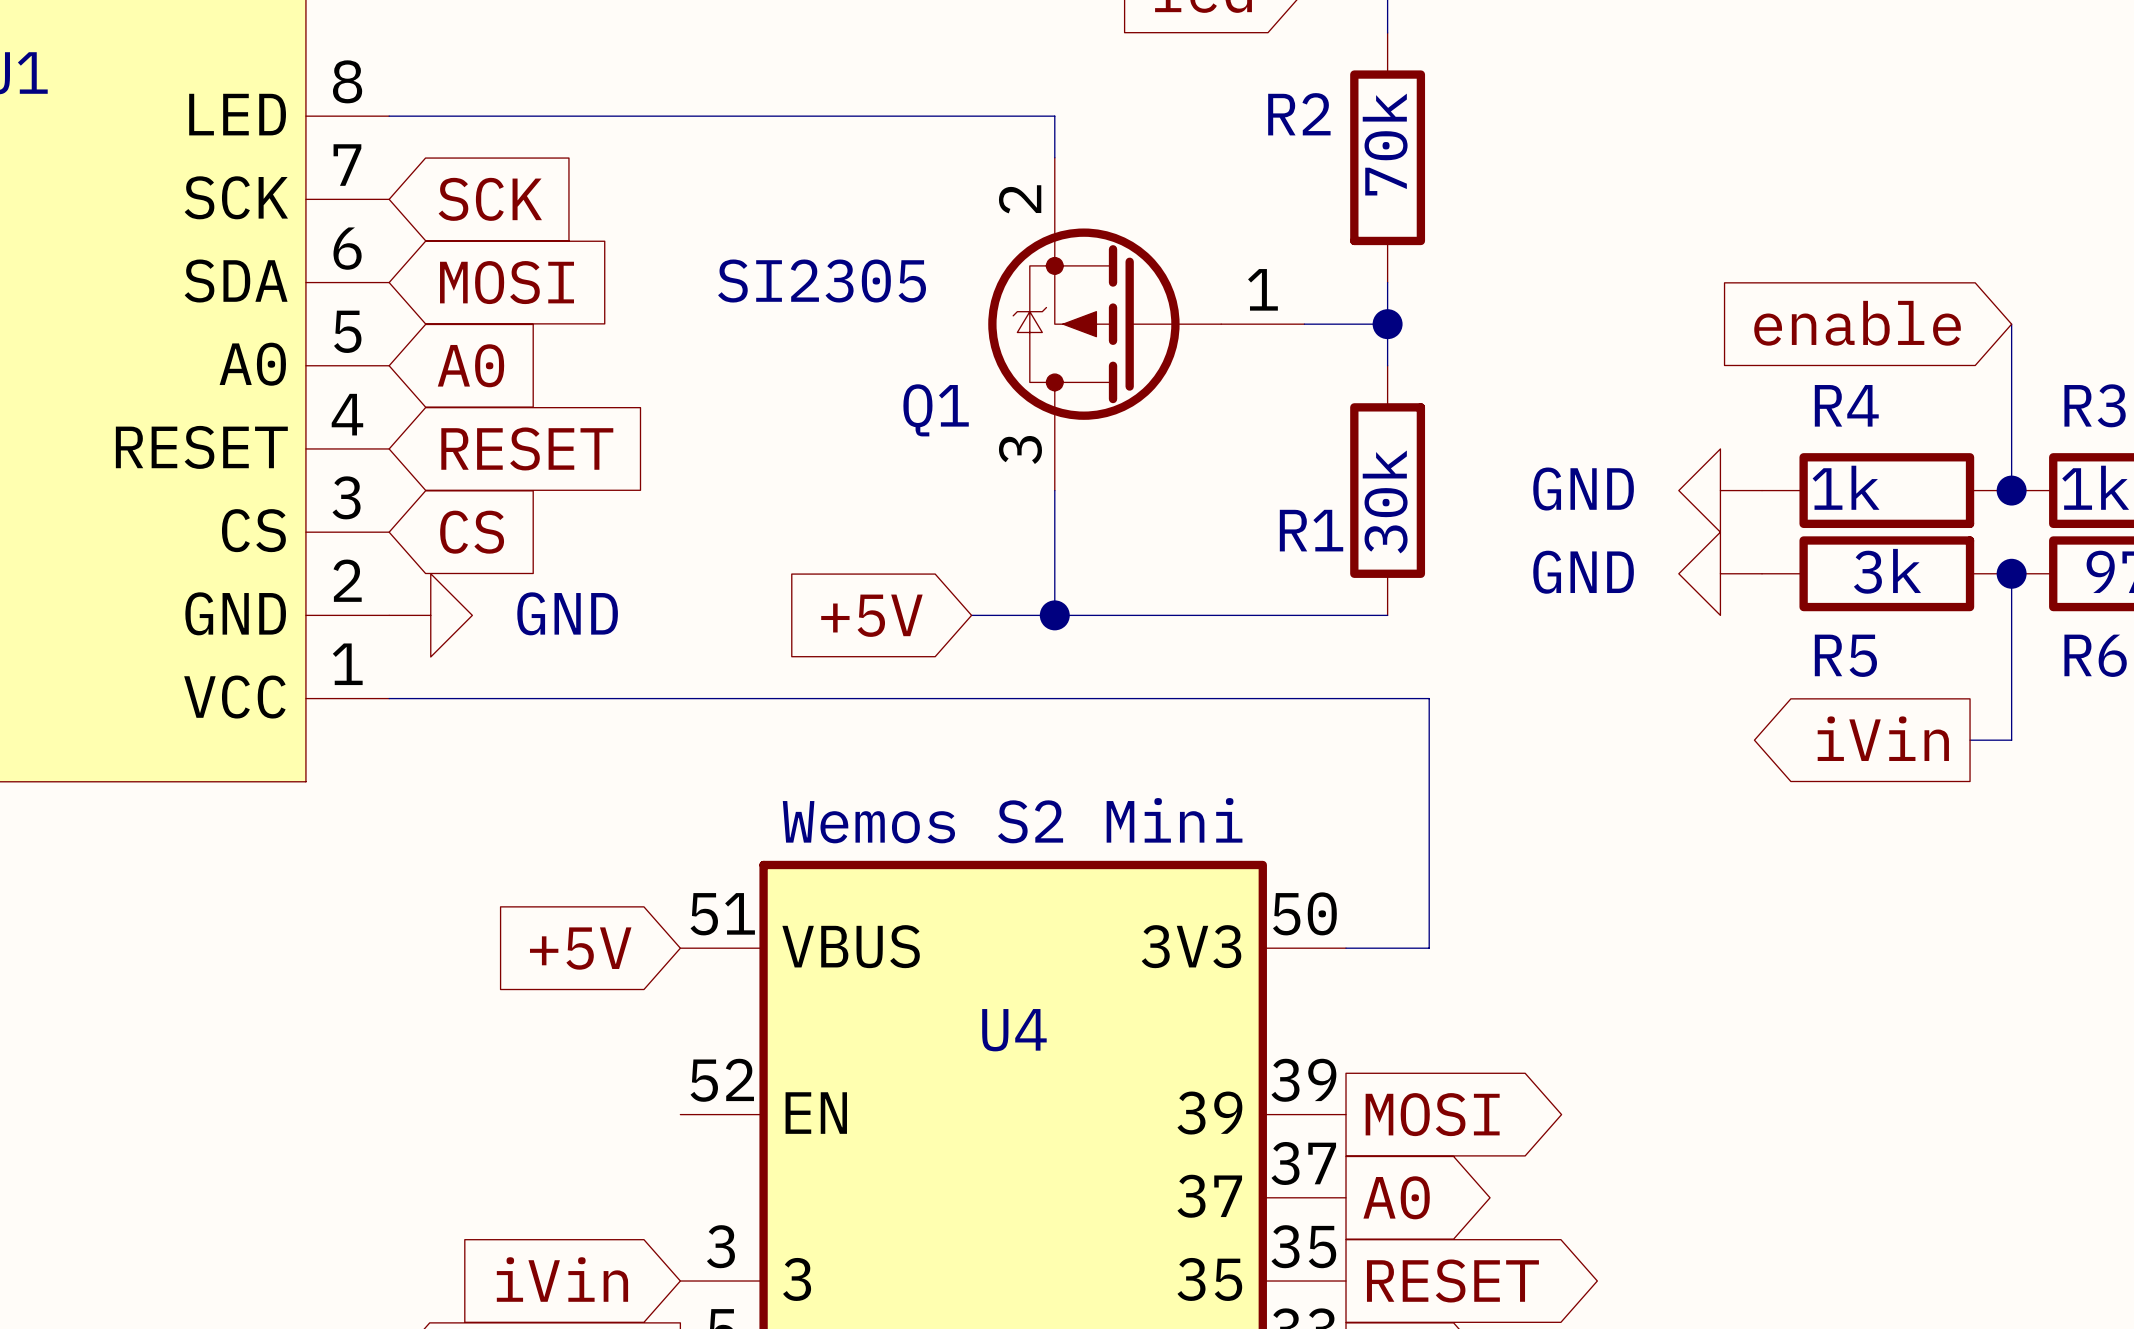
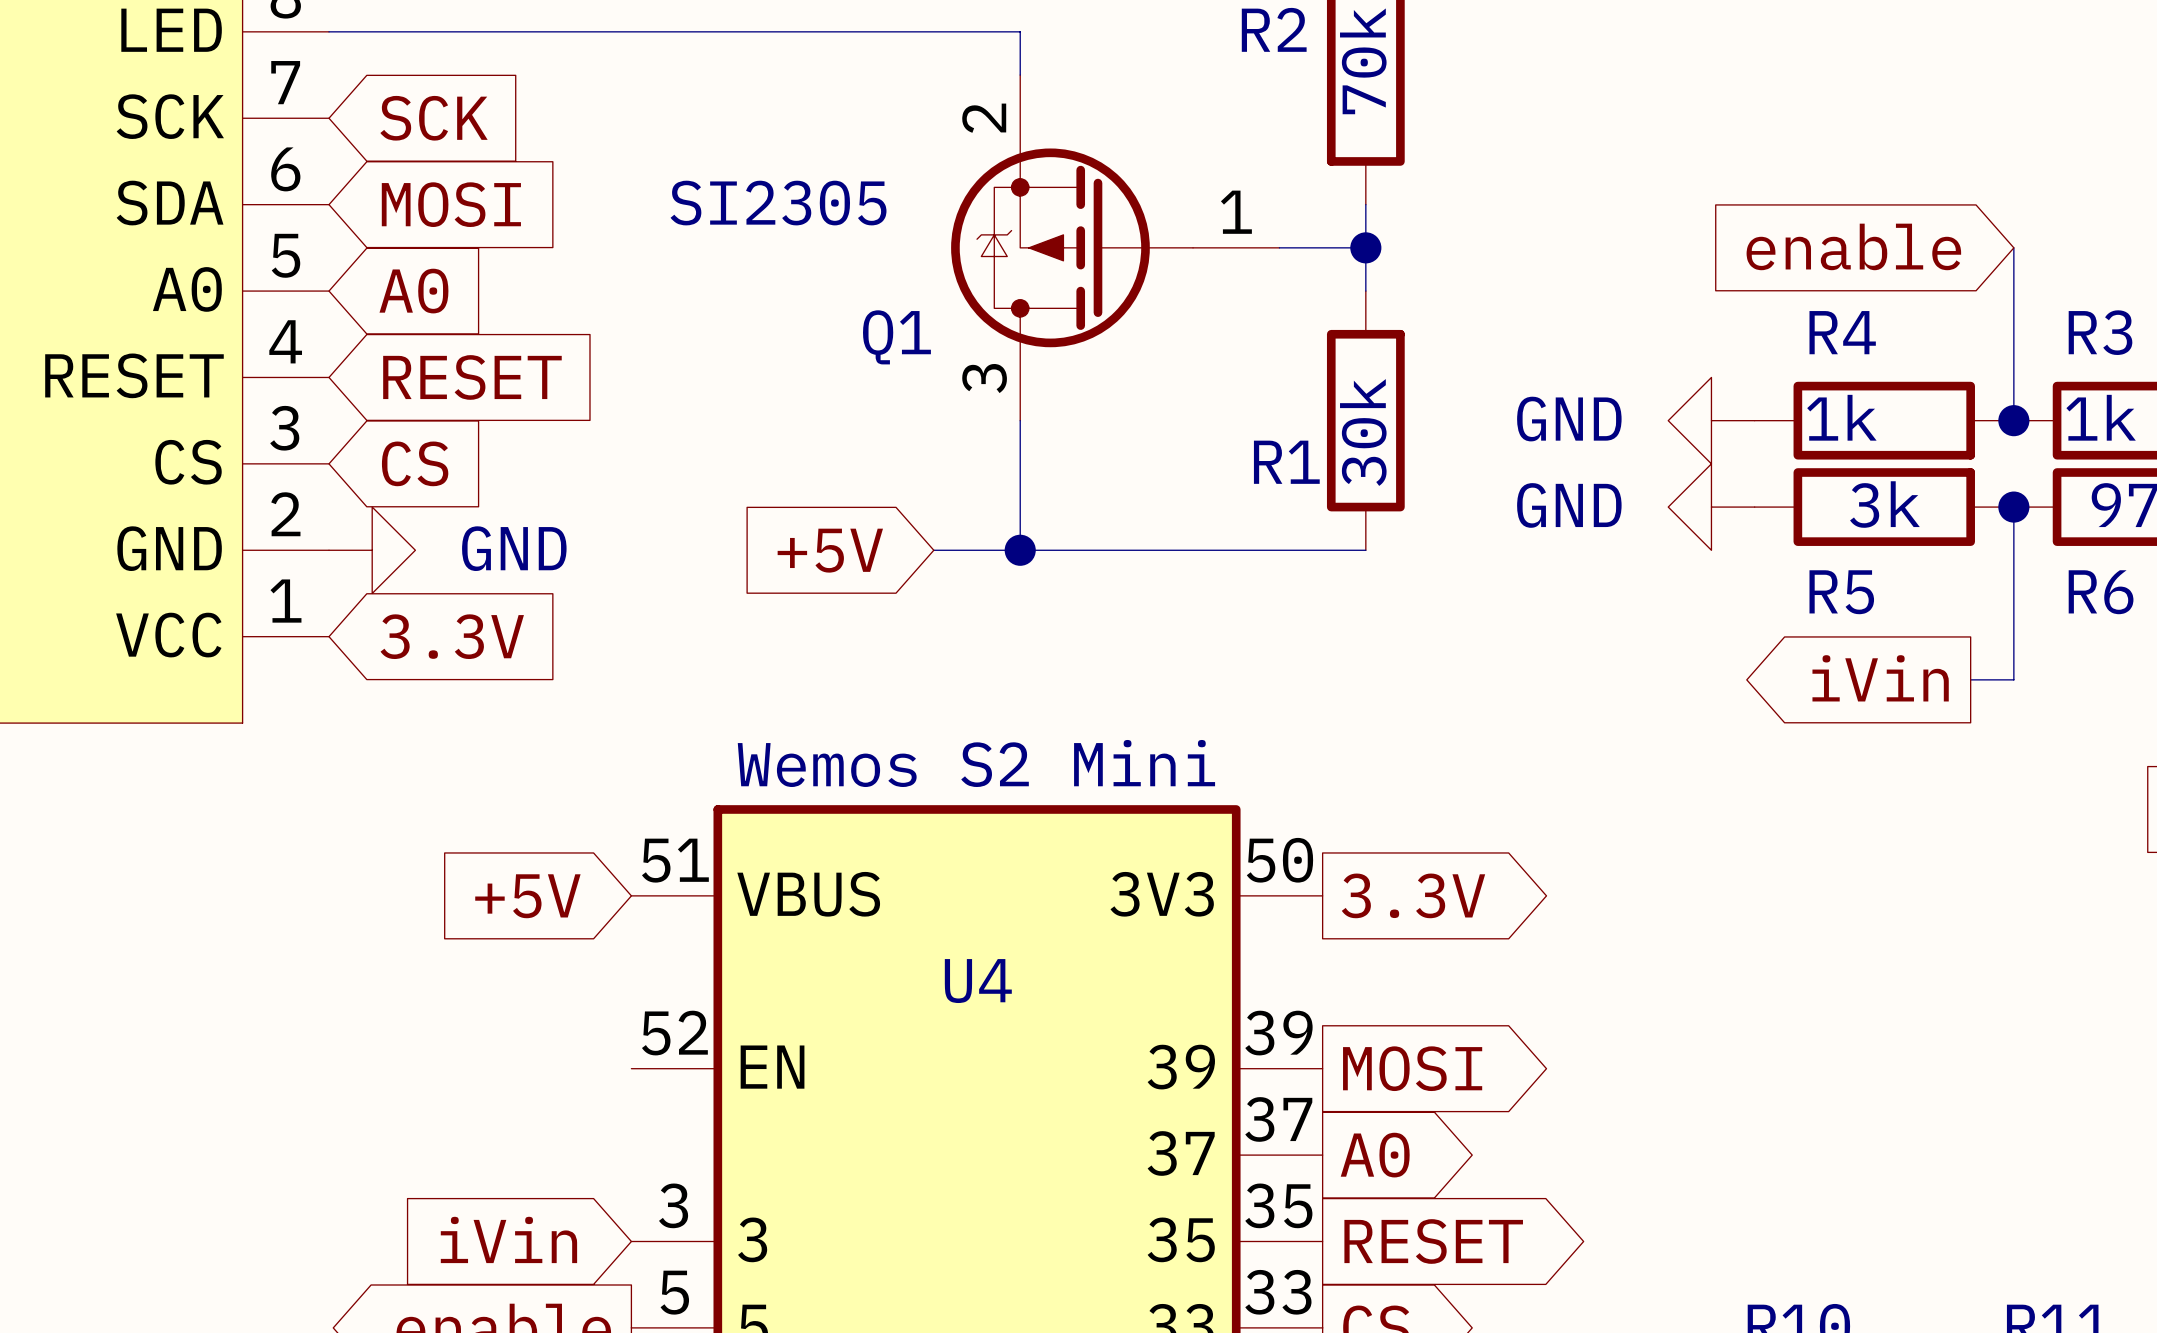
wire: (389, 698) (1429, 698) (1429, 948) (1346, 948) -> none
global label: none -> 3.3V (452, 636)
global label: none -> 3.3V (1413, 895)

